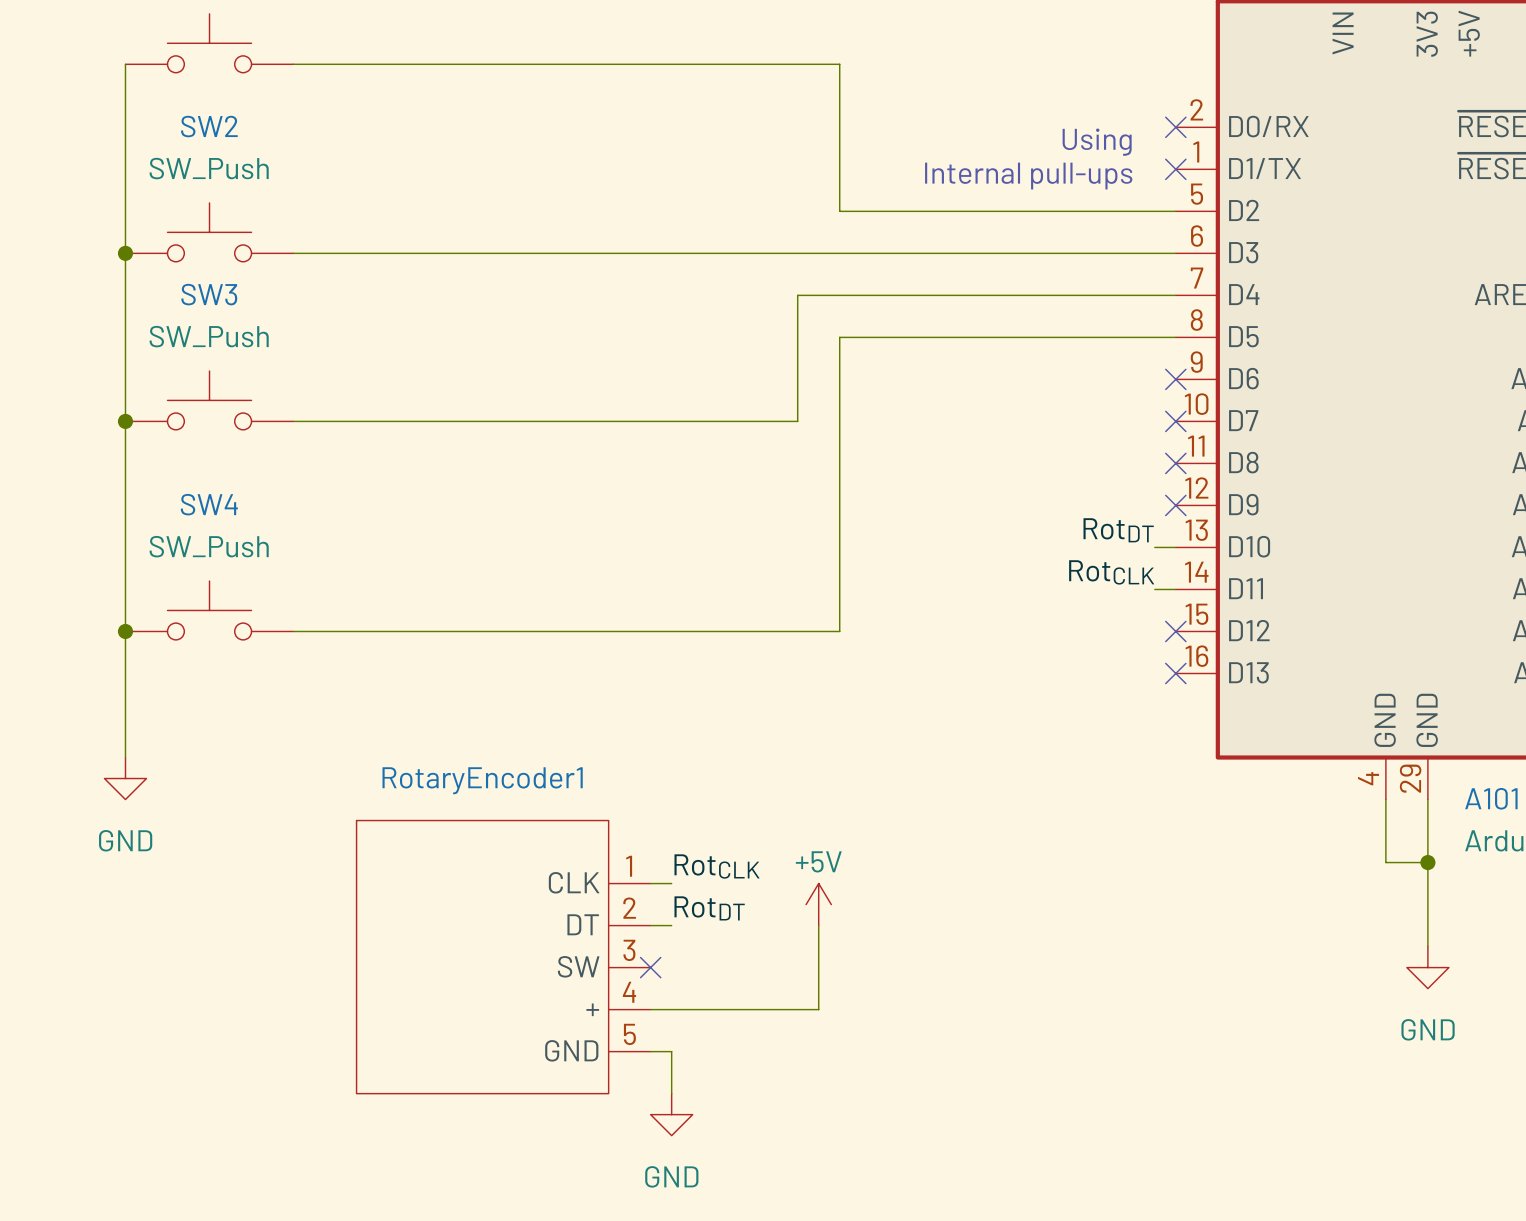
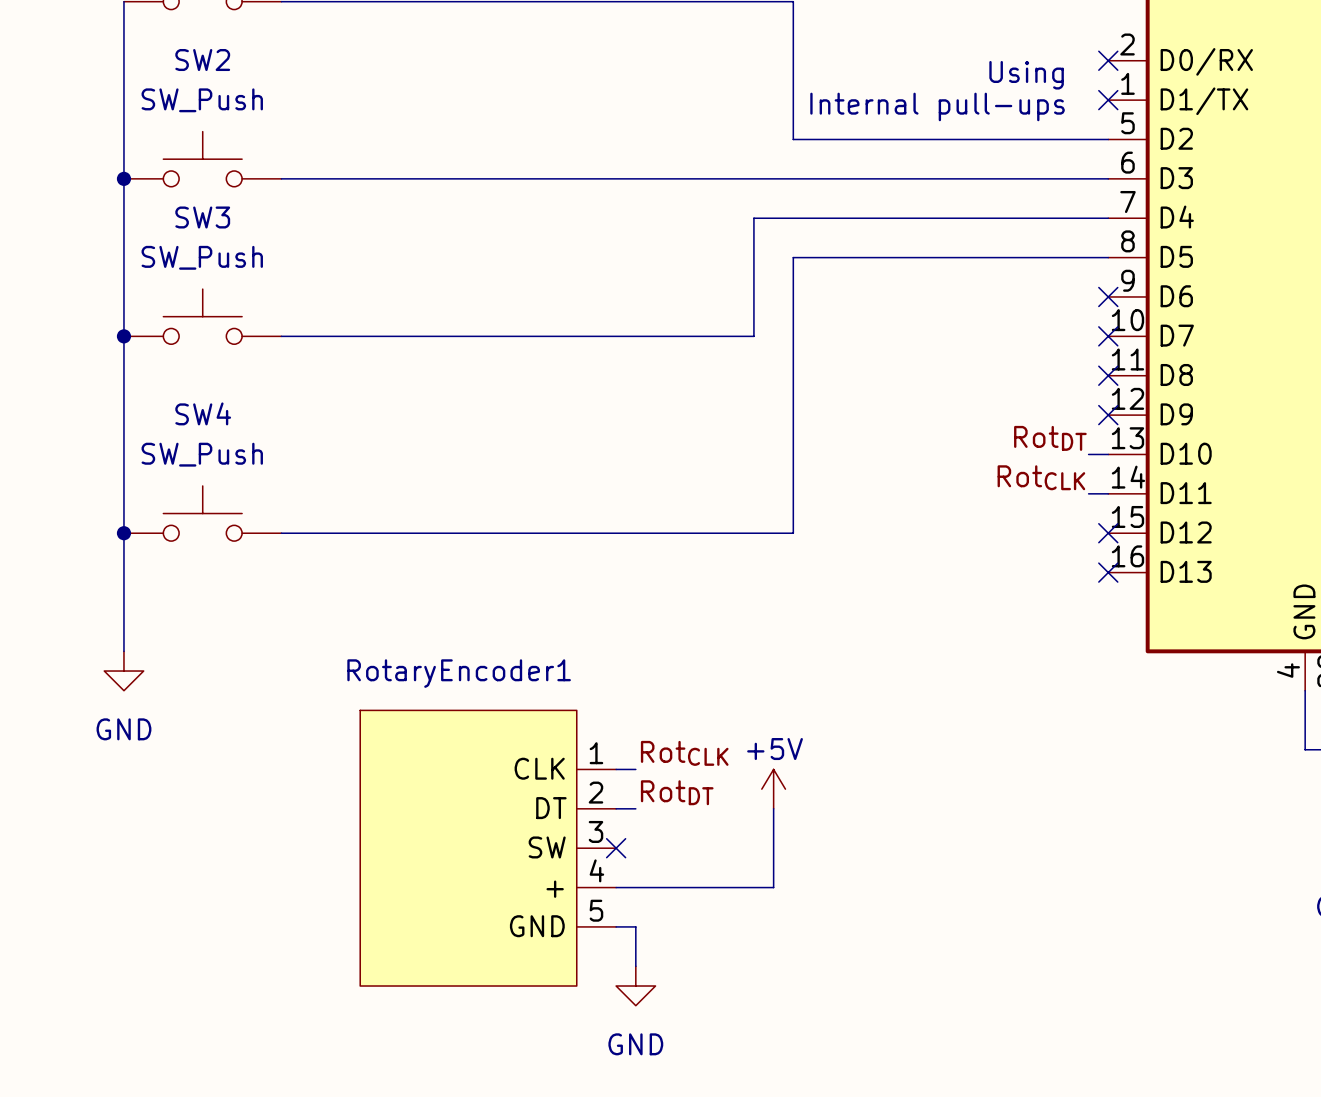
RotaryEncoder1 symbol: [356, 820, 651, 1094] -> [360, 710, 617, 987]

